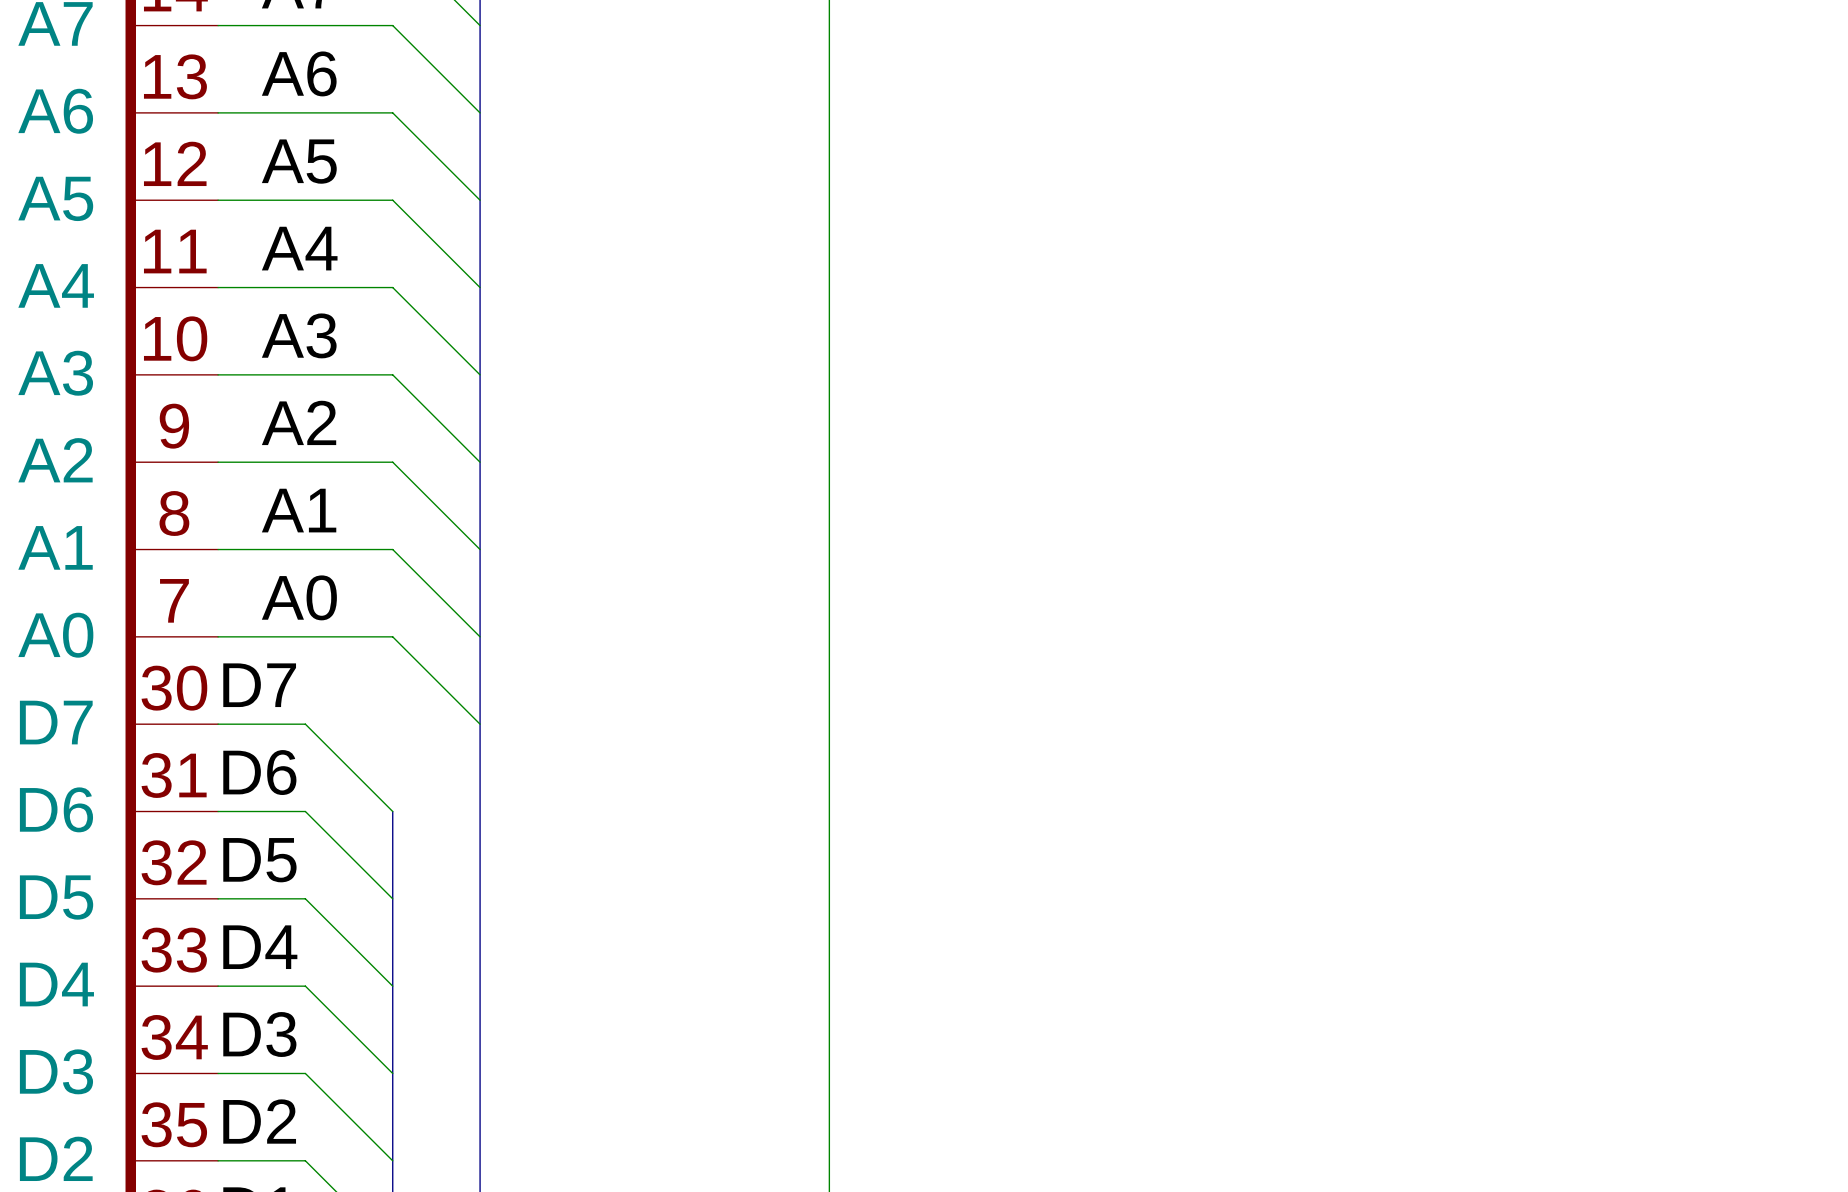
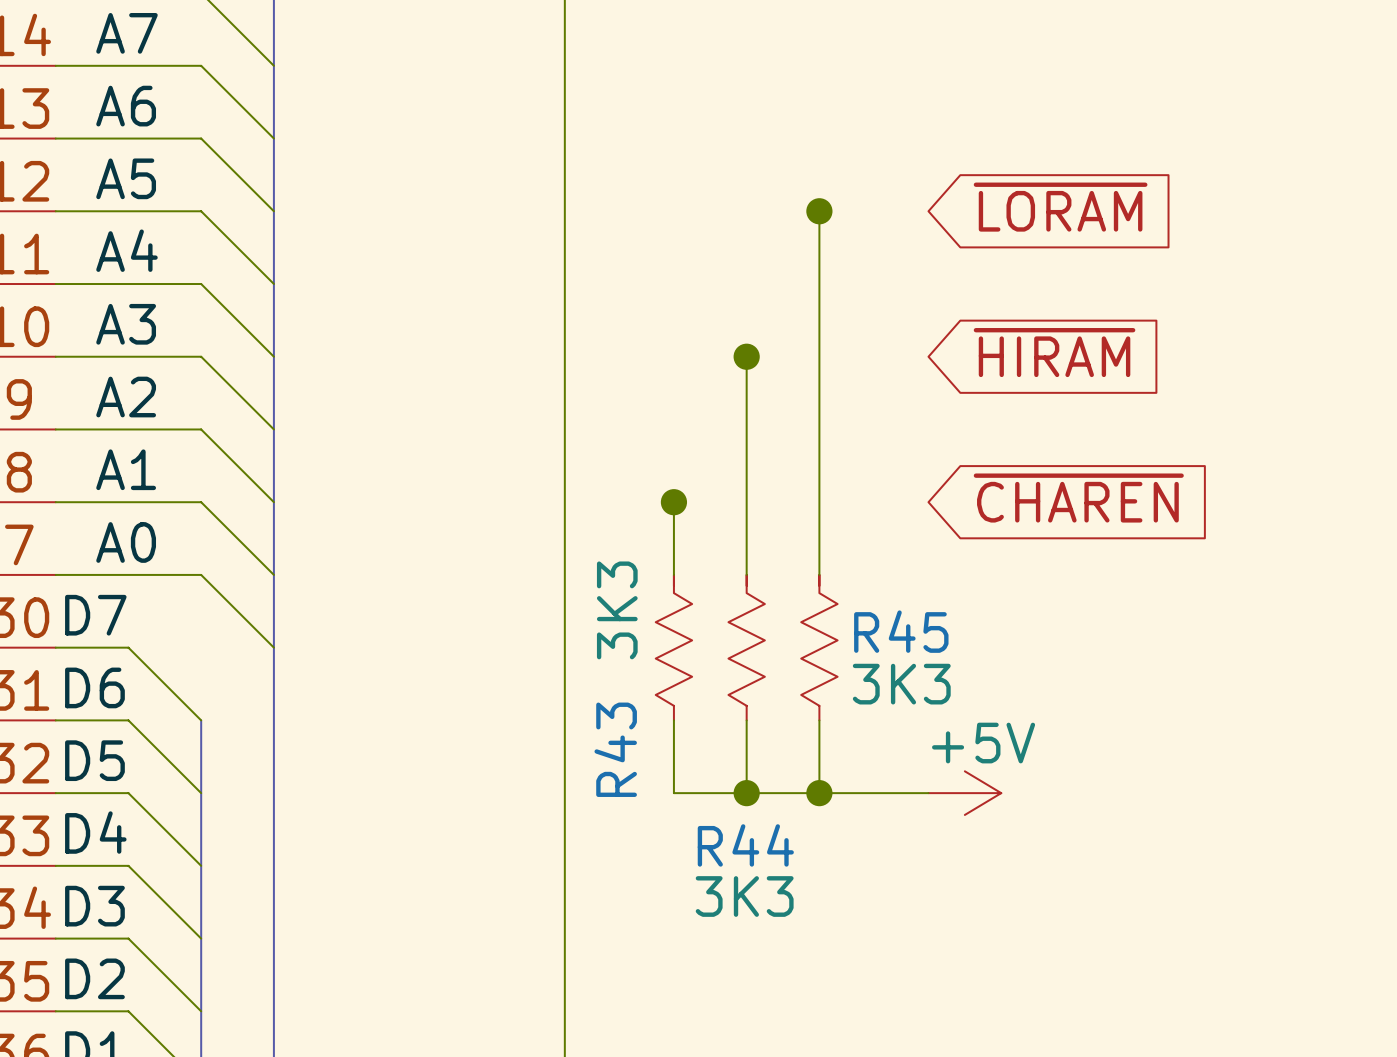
global label: none -> ~{LORAM} (1060, 207)
wire: none -> (819, 211) (819, 574)
junction: none -> (819, 211)
global label: none -> ~{HIRAM} (1054, 352)
wire: none -> (746, 356) (746, 574)
junction: none -> (746, 356)
global label: none -> ~{CHAREN} (1078, 498)
wire: none -> (673, 502) (673, 574)
junction: none -> (673, 502)
R43: none -> 3K3 (673, 647)
R44: none -> 3K3 (746, 647)
R45: none -> 3K3 (819, 647)
wire: none -> (673, 720) (673, 793) (928, 793)
wire: none -> (746, 720) (746, 793)
wire: none -> (819, 720) (819, 793)
junction: none -> (746, 793)
junction: none -> (819, 793)
power symbol: none -> +5V (964, 793)

